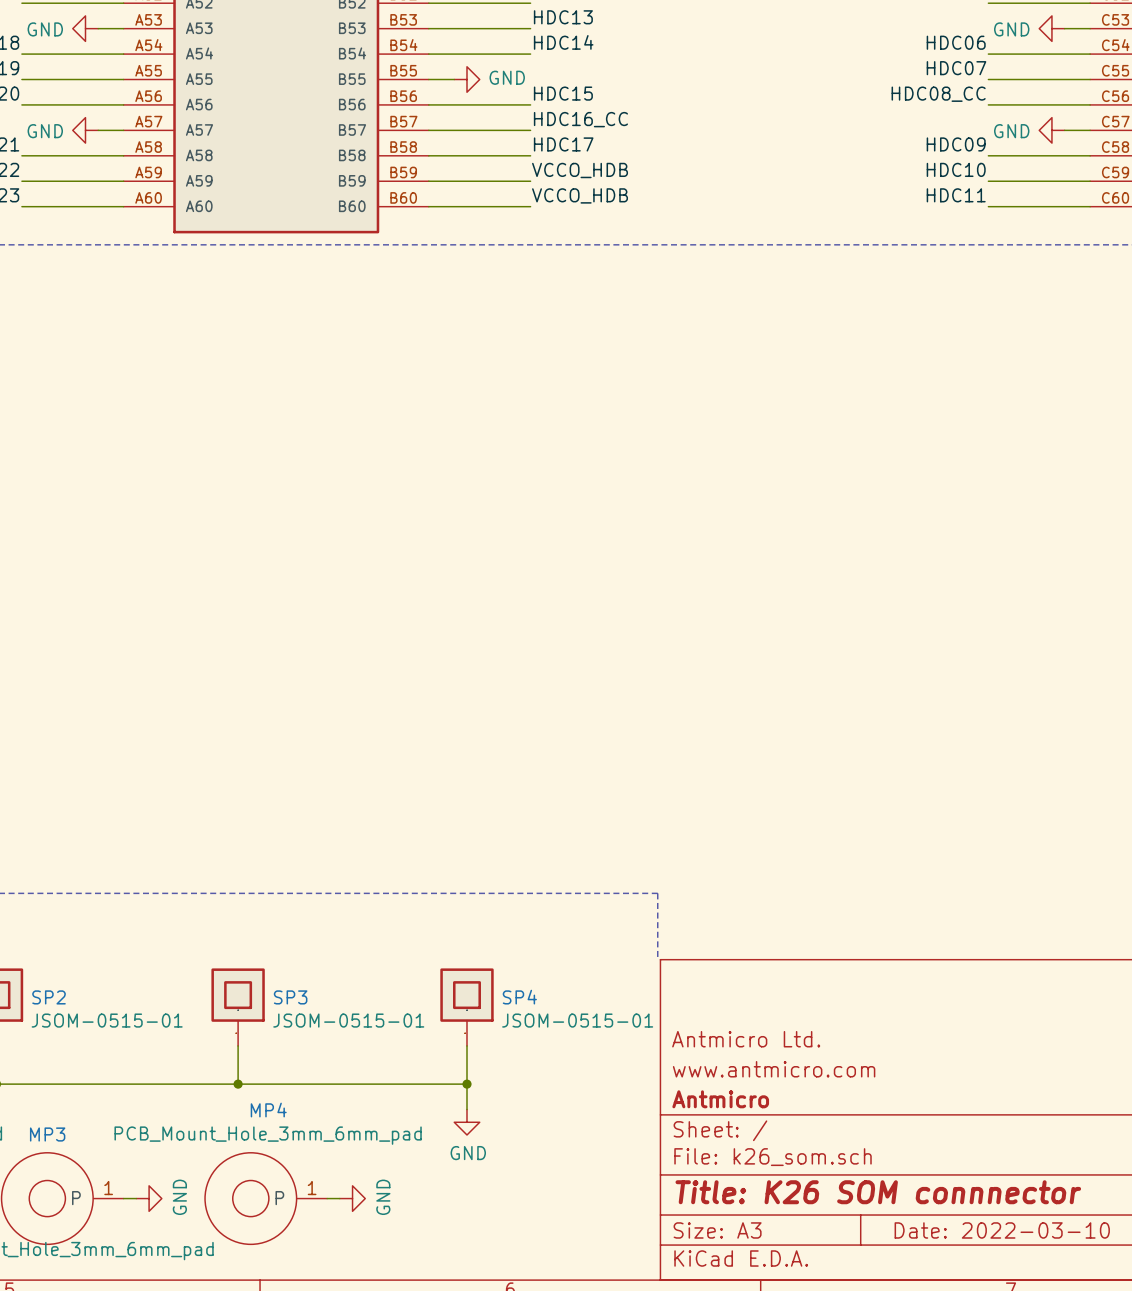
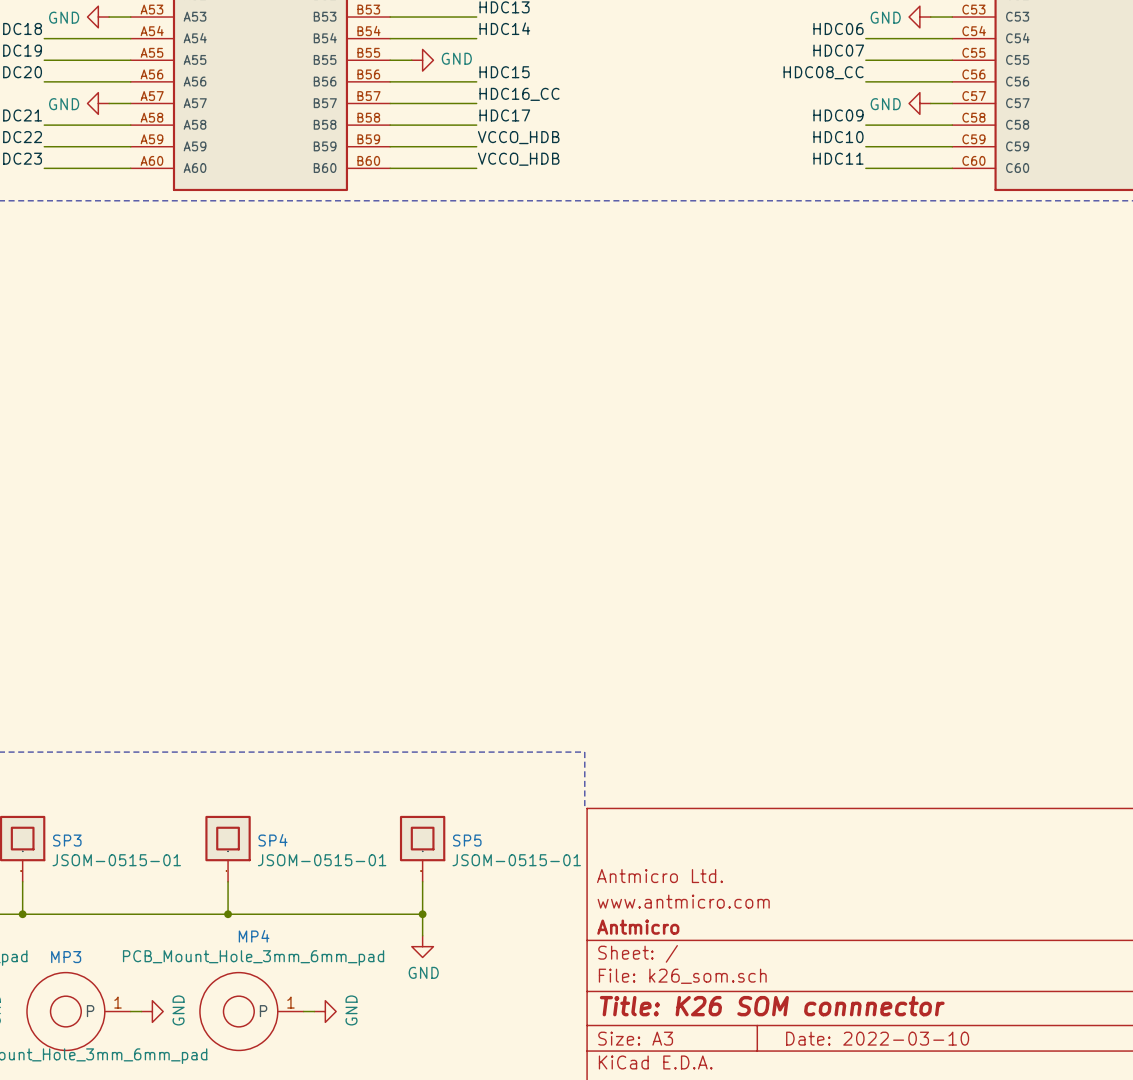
SP2 name: SP2 (49, 997) -> SP3 (67, 840)
SP3 name: SP3 (290, 997) -> SP4 (272, 840)
SP4 name: SP4 (519, 997) -> SP5 (467, 840)

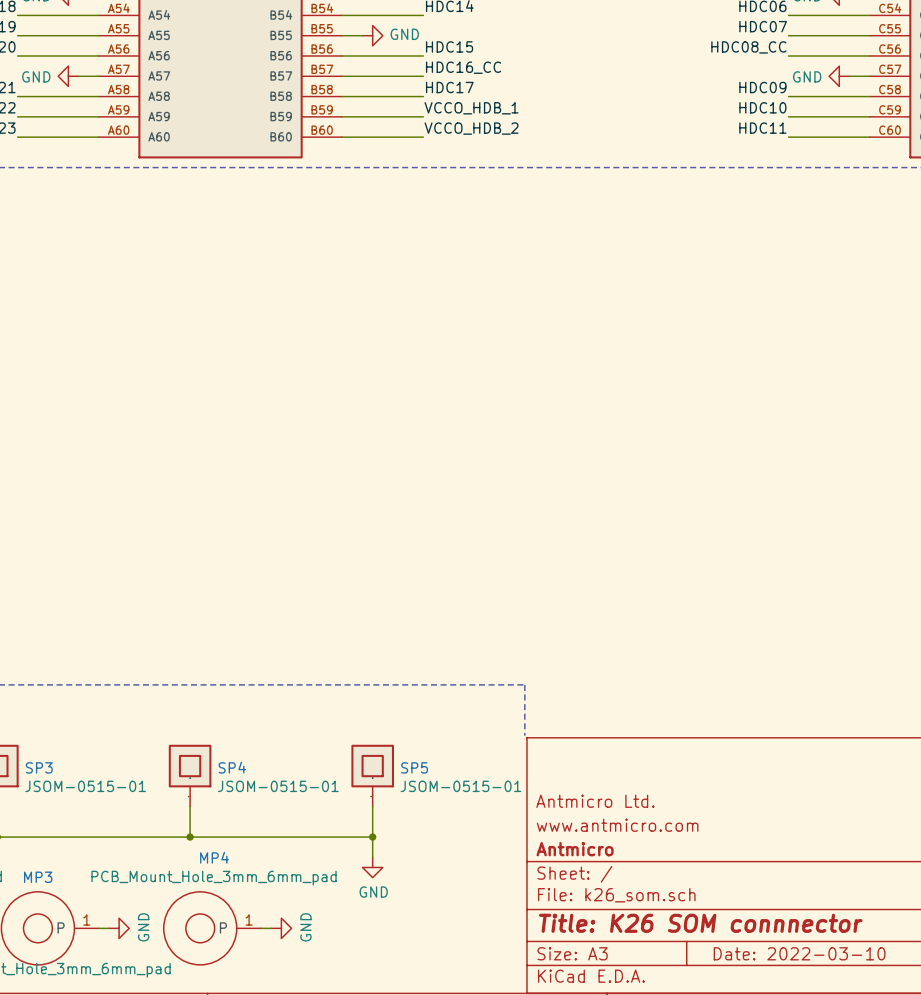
label: VCCO_HDB (518, 137) -> VCCO_HDB_1 (471, 108)
label: VCCO_HDB (518, 159) -> VCCO_HDB_2 (471, 128)

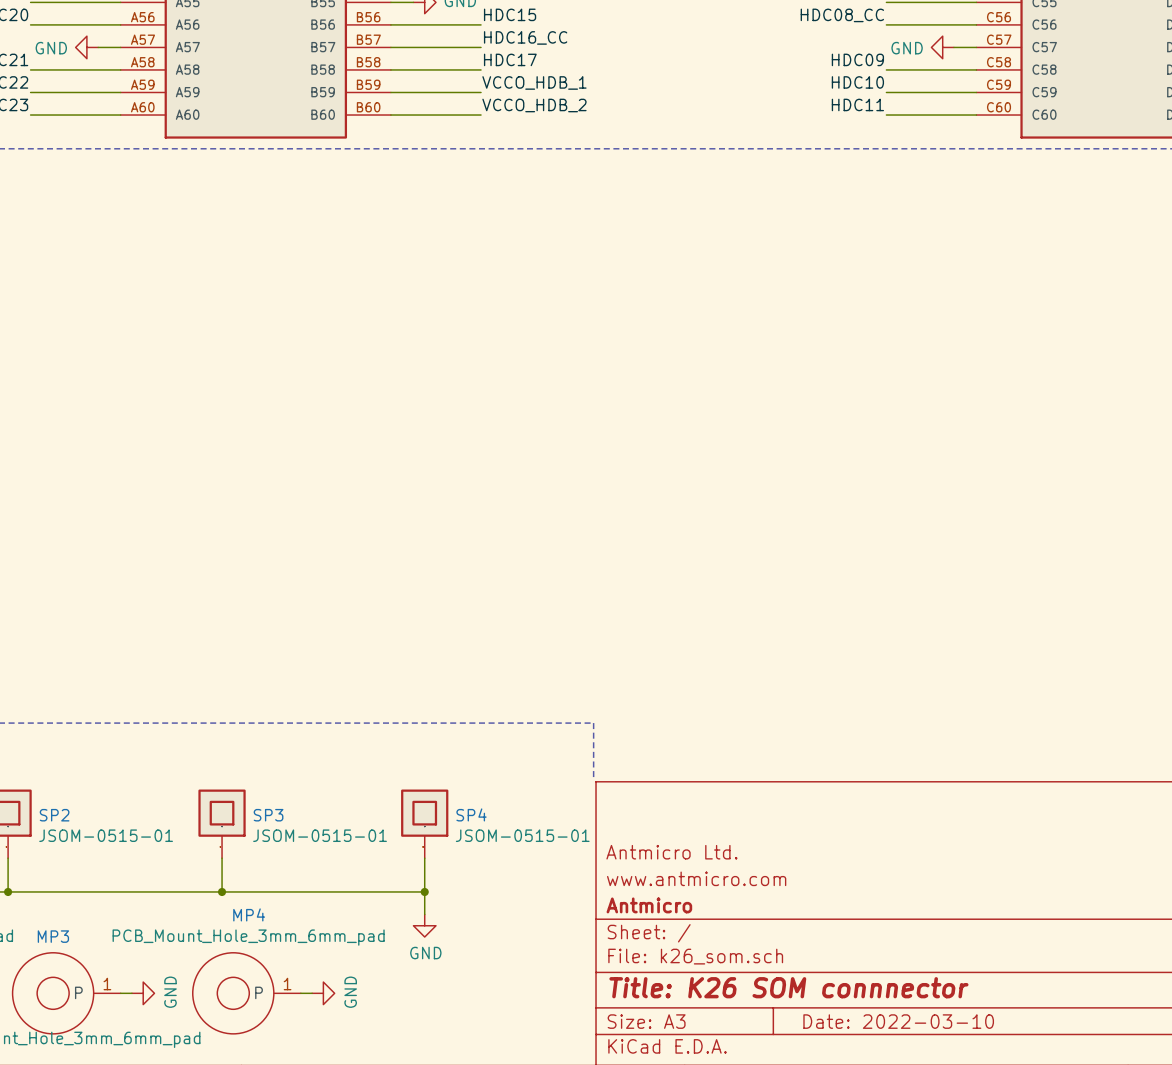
SP3 name: SP3 (39, 767) -> SP2 (54, 815)
SP4 name: SP4 (232, 767) -> SP3 (268, 815)
SP5 name: SP5 (414, 767) -> SP4 (471, 814)

